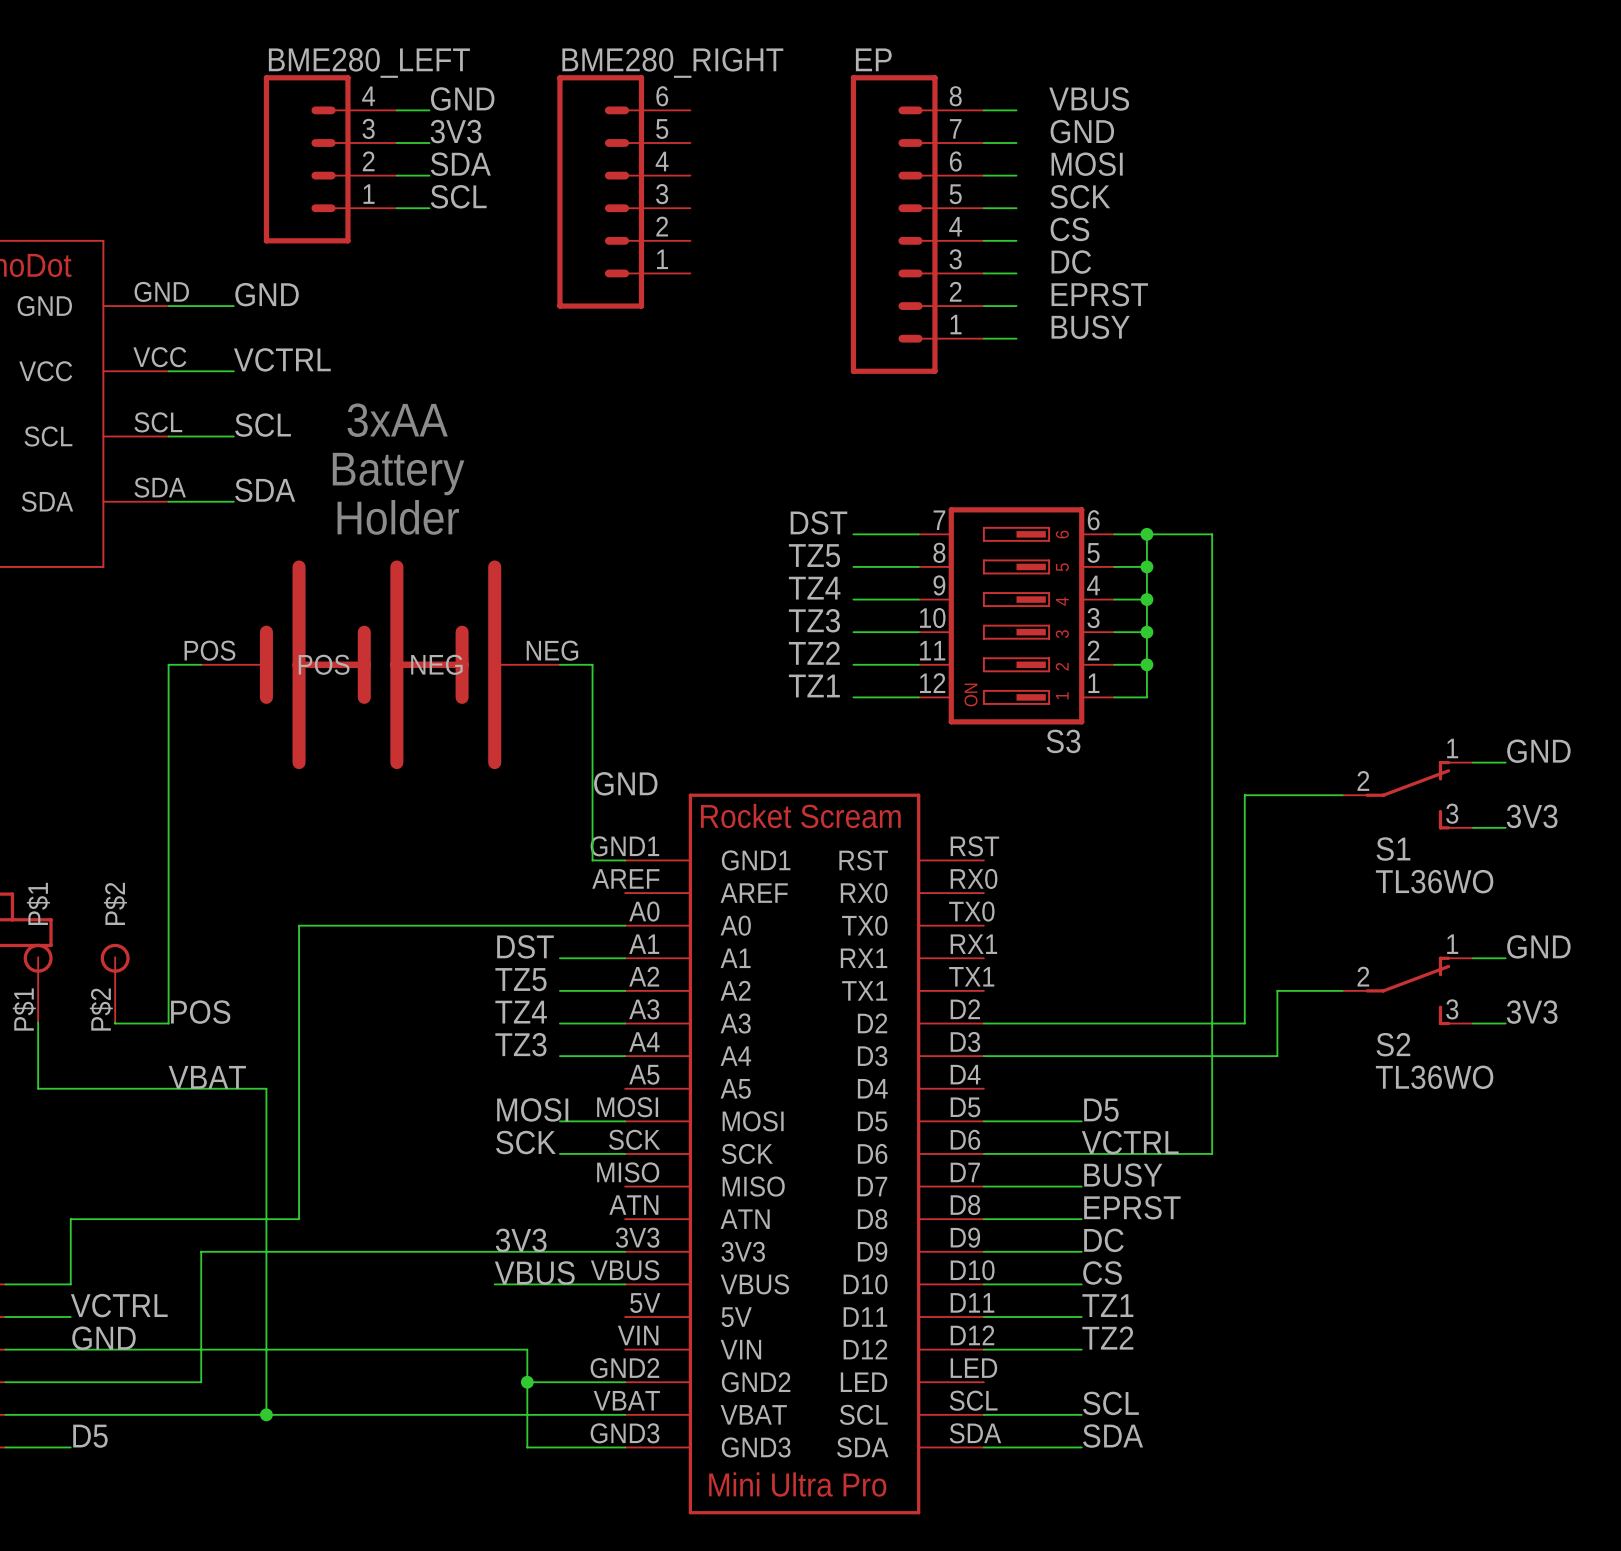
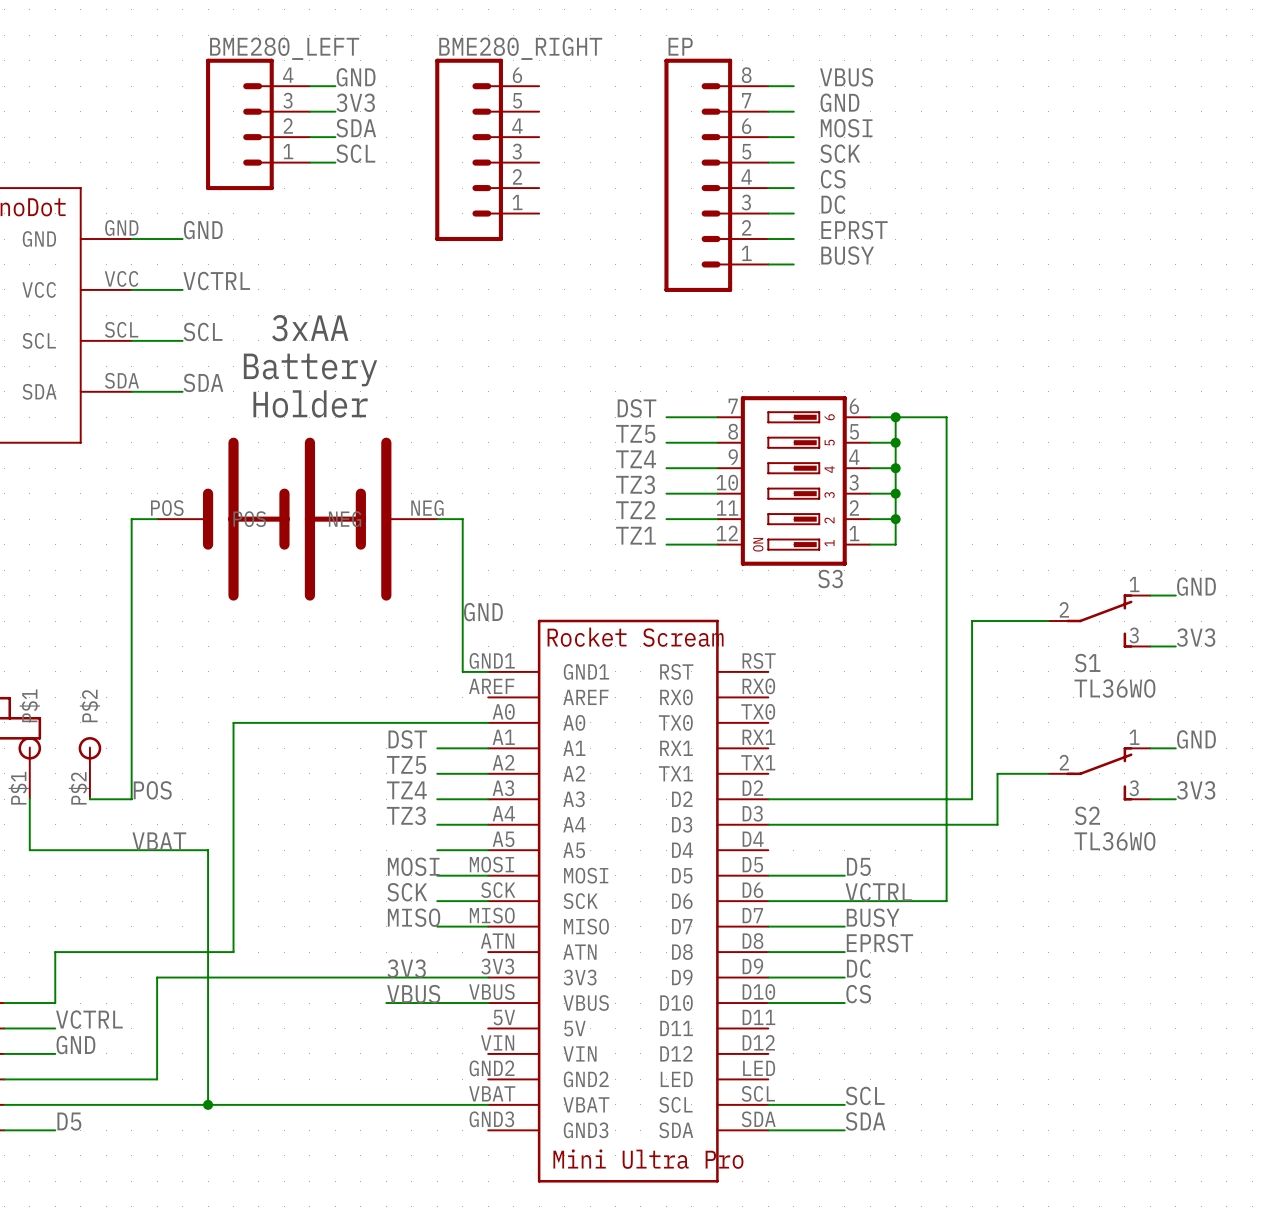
wire: none -> (437, 850) (488, 850)
label: none -> MISO (414, 917)
wire: none -> (437, 926) (488, 926)
label: TZ1 (1107, 1305) -> none
wire: (983, 1317) (1081, 1317) -> none
label: TZ2 (1107, 1338) -> none
wire: (70, 1349) (527, 1349) (527, 1447) (625, 1447) -> none
wire: (983, 1349) (1081, 1349) -> none
wire: (527, 1382) (625, 1382) -> none
junction: (527, 1382) -> none

